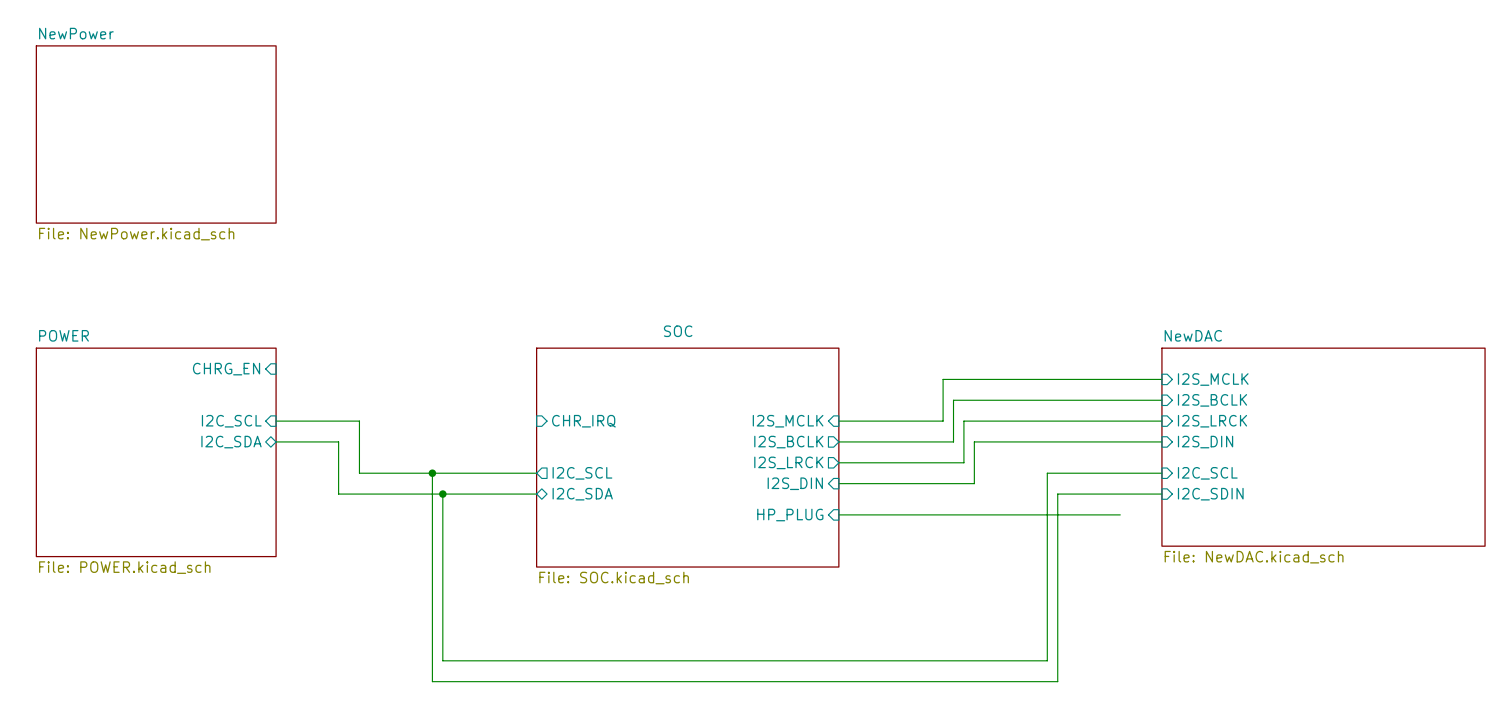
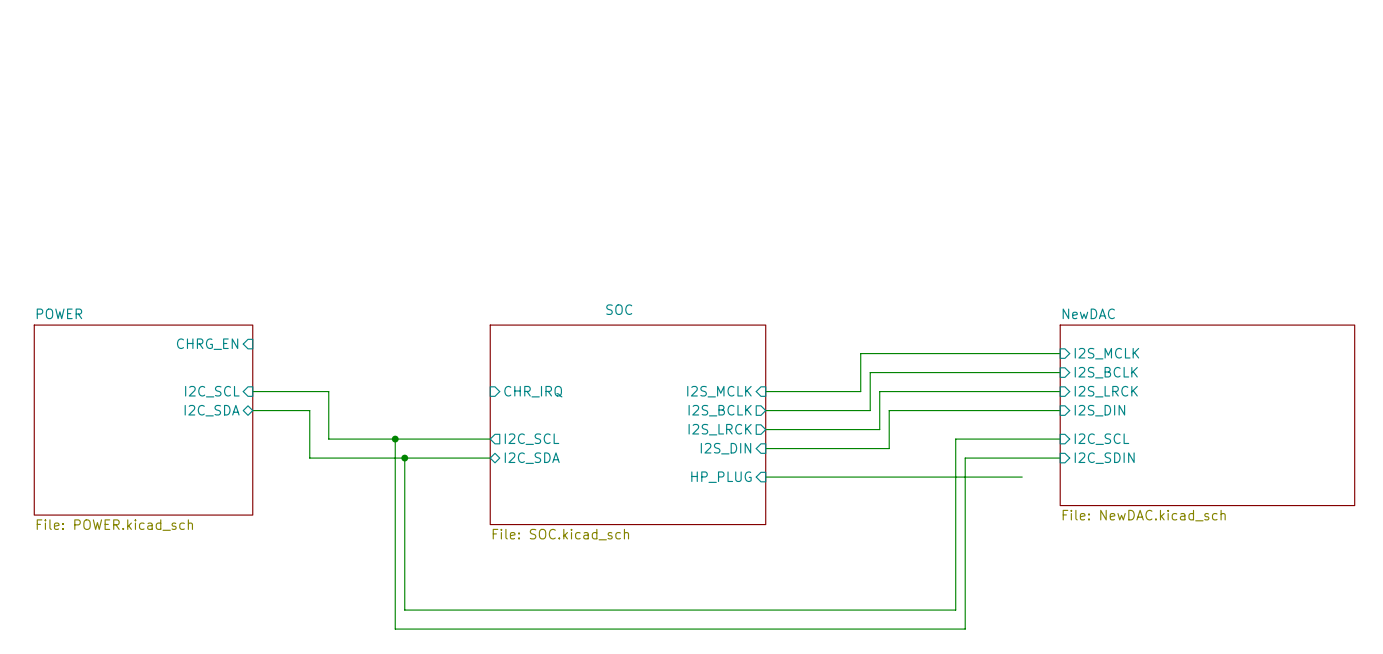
sheet NewPower: File: NewPower.kicad_sch (156, 134) -> none

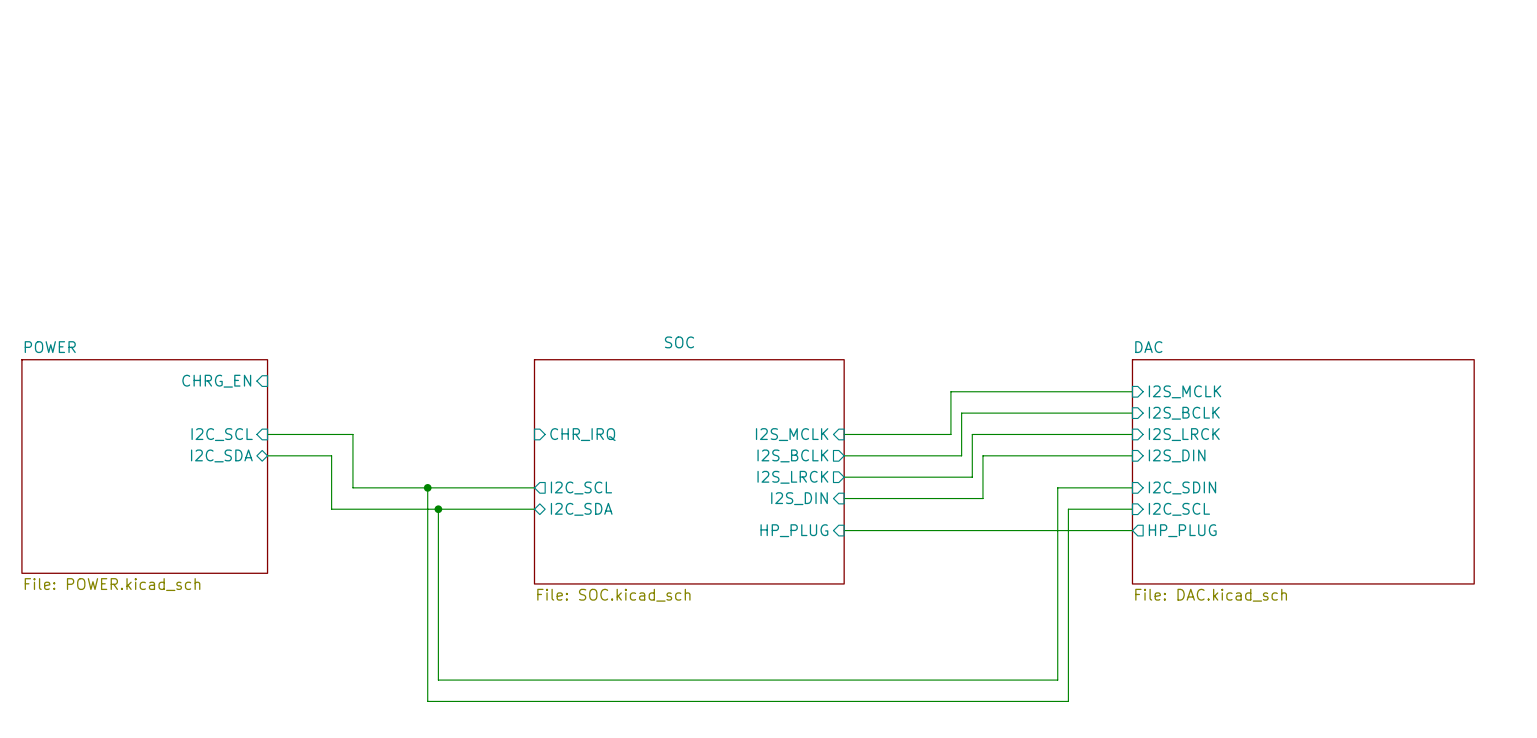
wire: (1022, 353) (1060, 353) -> none
sheet pin position: I2S_MCLK (1106, 353) -> I2S_MCLK (1185, 391)
wire: (1022, 372) (1060, 372) -> none
sheet pin position: I2S_BCLK (1106, 372) -> I2S_BCLK (1184, 413)
wire: (1022, 391) (1060, 391) -> none
sheet pin position: I2S_LRCK (1106, 391) -> I2S_LRCK (1184, 434)
wire: (1022, 410) (1060, 410) -> none
sheet pin position: I2S_DIN (1099, 410) -> I2S_DIN (1177, 455)
sheet NewDAC: File: NewDAC.kicad_sch (1207, 415) -> none
sheet DAC: none -> File: DAC.kicad_sch (1303, 471)
wire: (1022, 439) (1060, 439) -> none
sheet pin position: I2C_SCL (1101, 439) -> I2C_SCL (1179, 509)
wire: (1022, 458) (1060, 458) -> none
sheet pin position: I2C_SDIN (1104, 458) -> I2C_SDIN (1182, 487)
sheet pin: none -> HP_PLUG (1182, 530)

